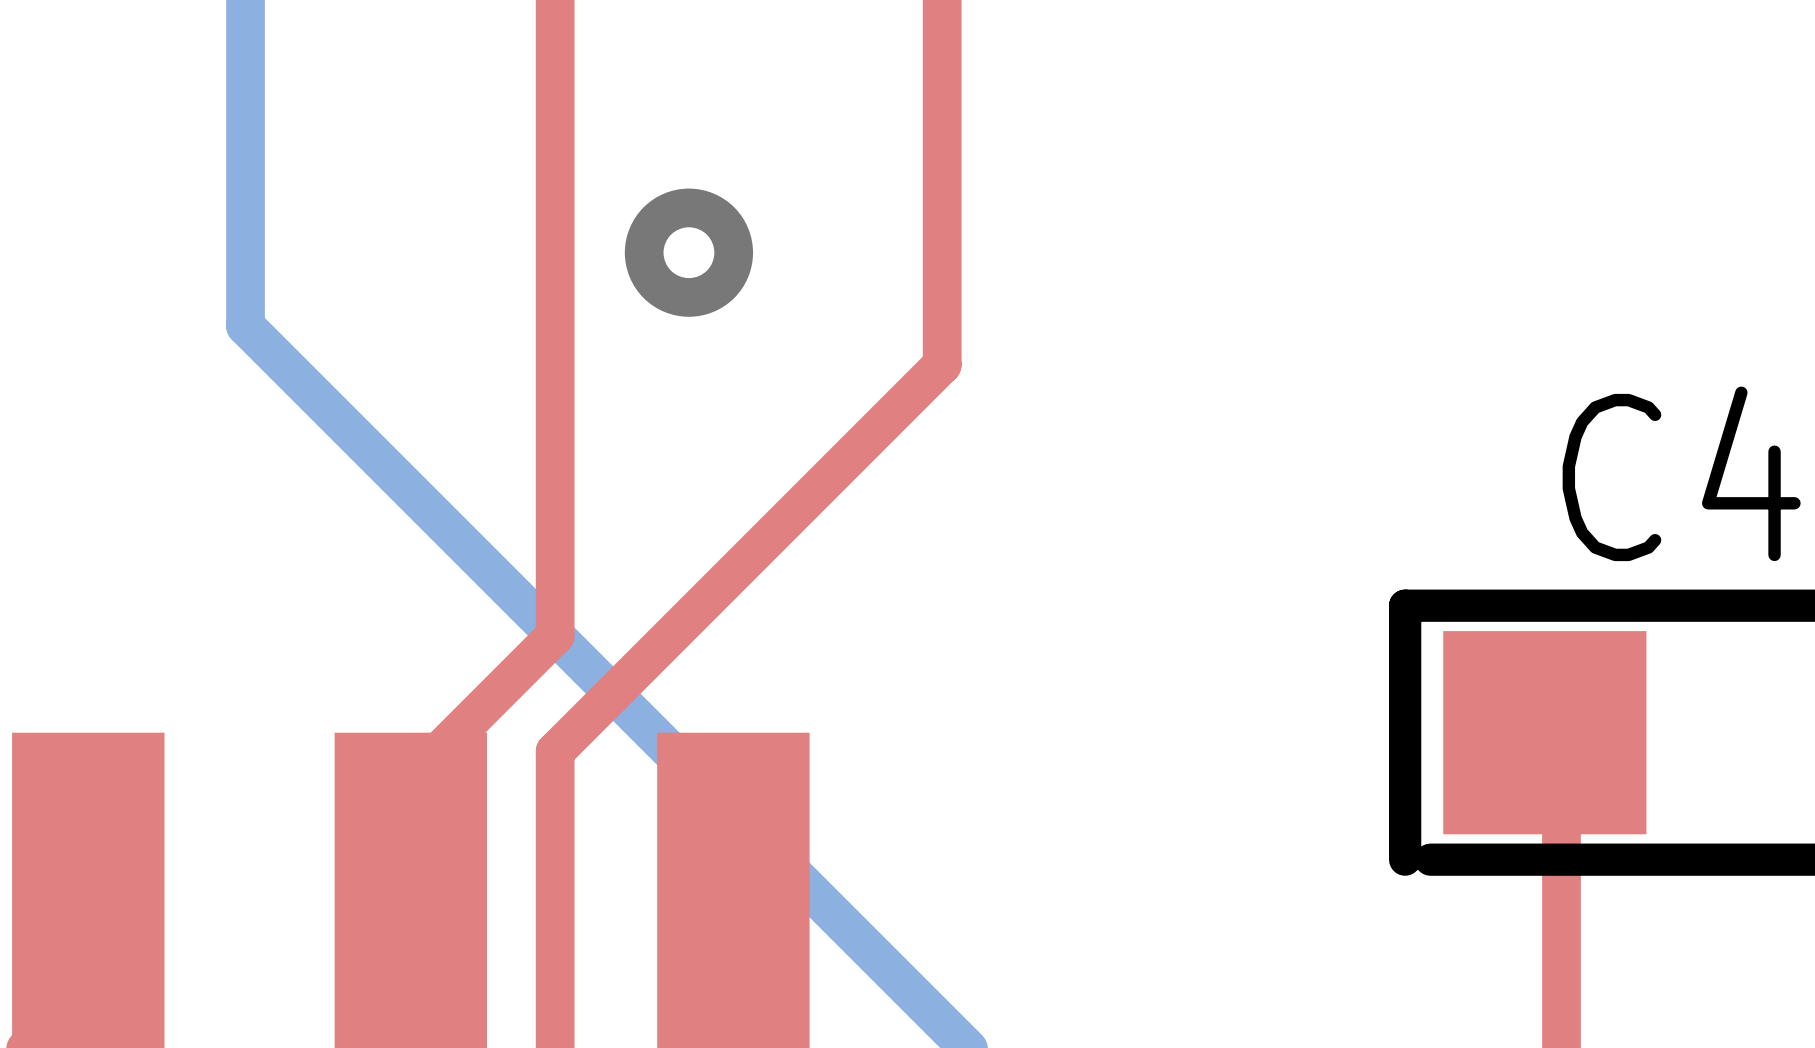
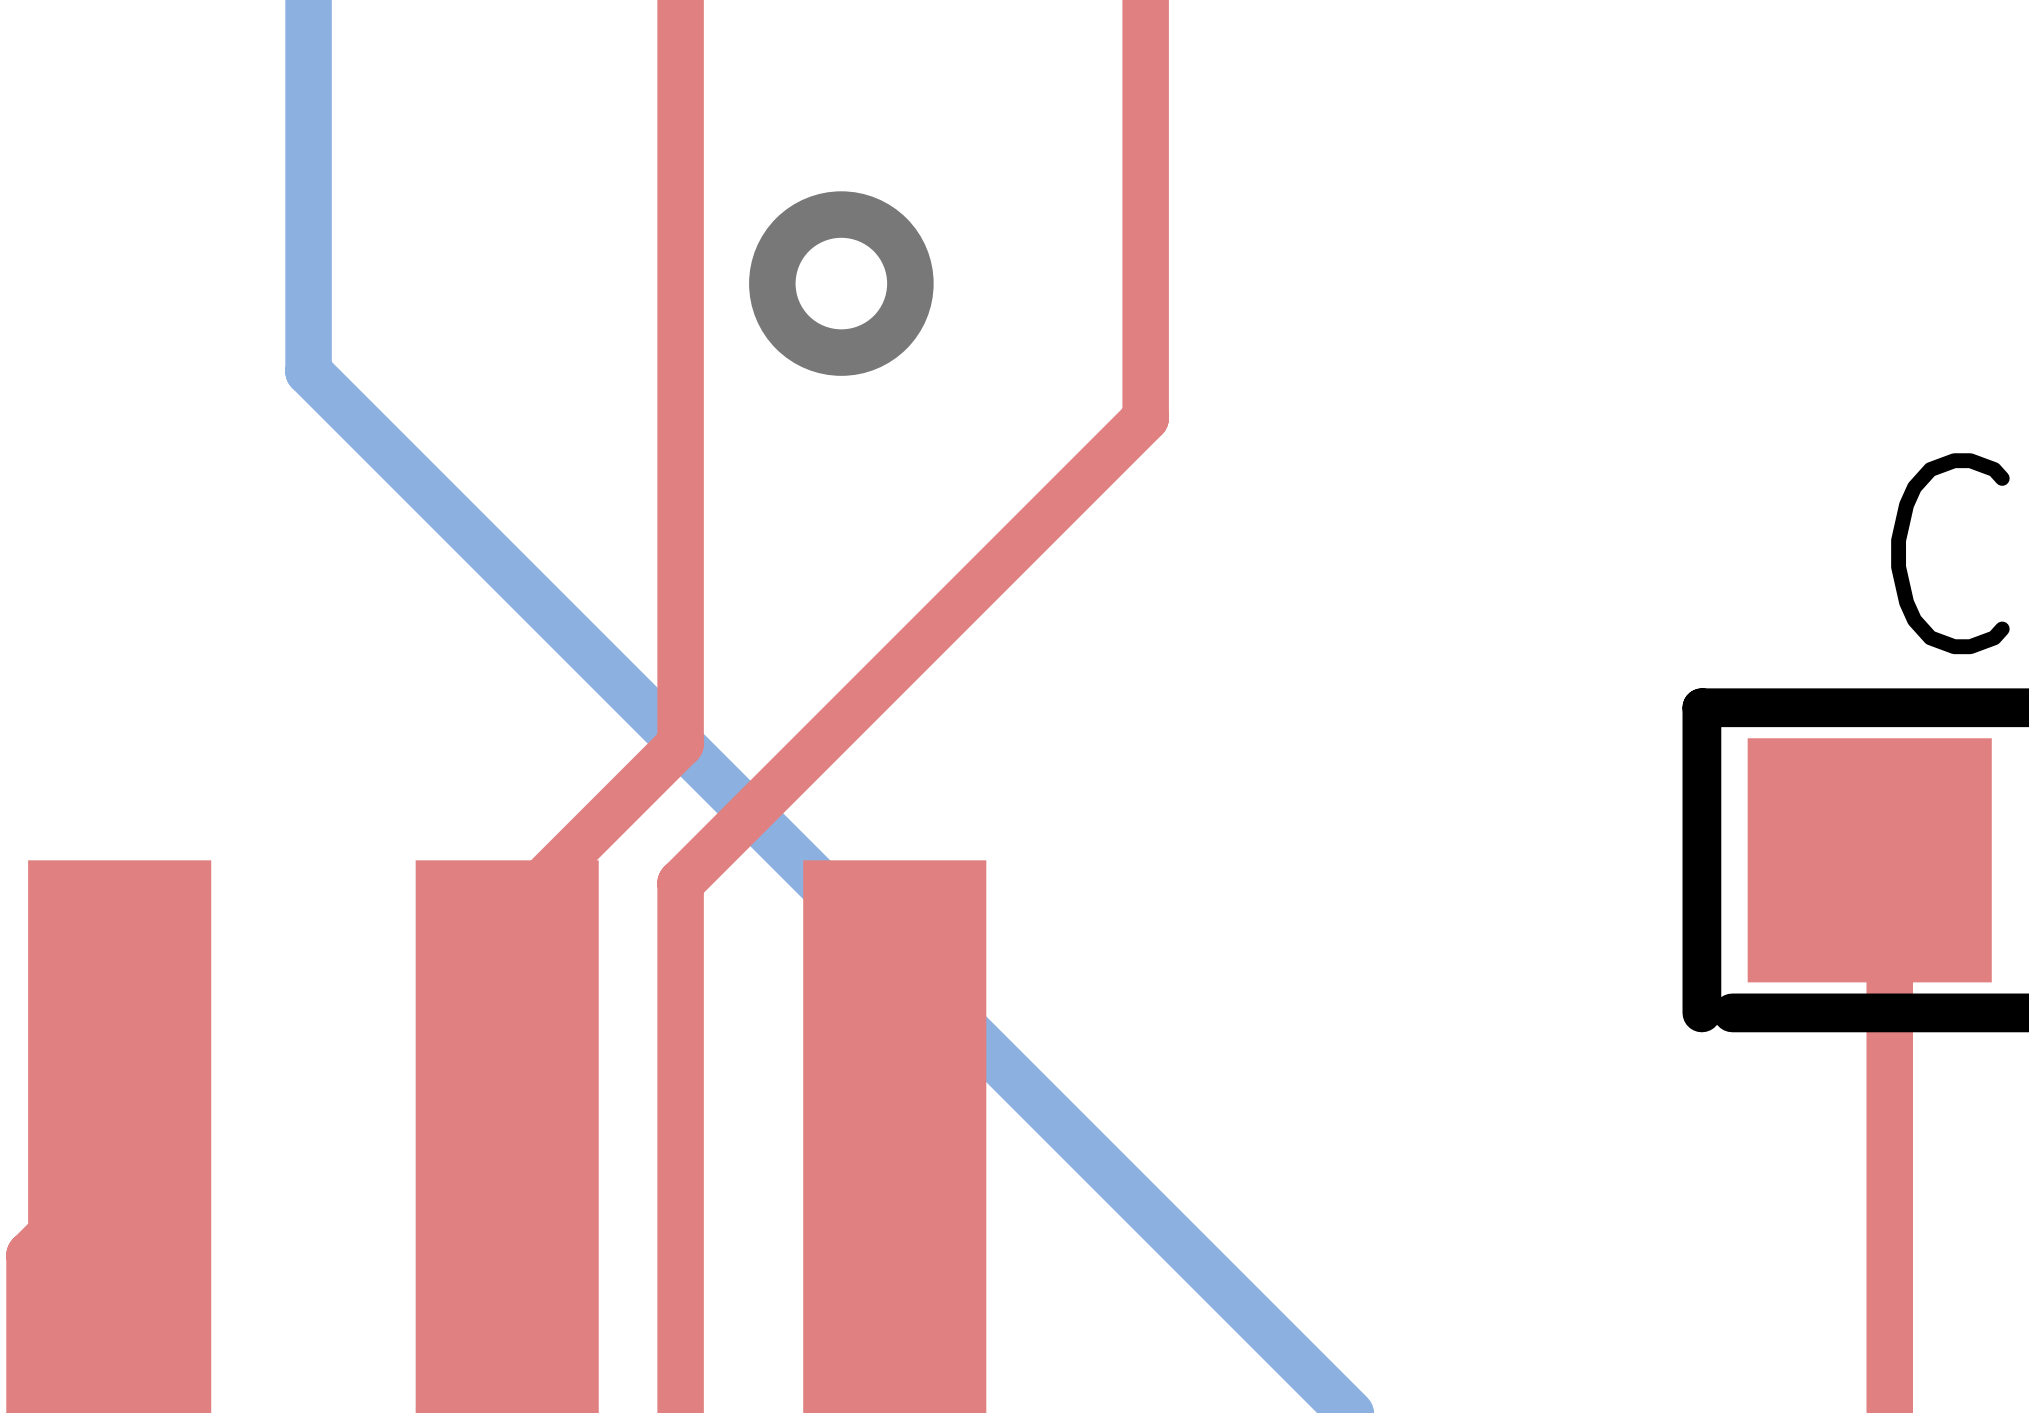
via size: [624, 188, 754, 317] -> [749, 191, 934, 376]

